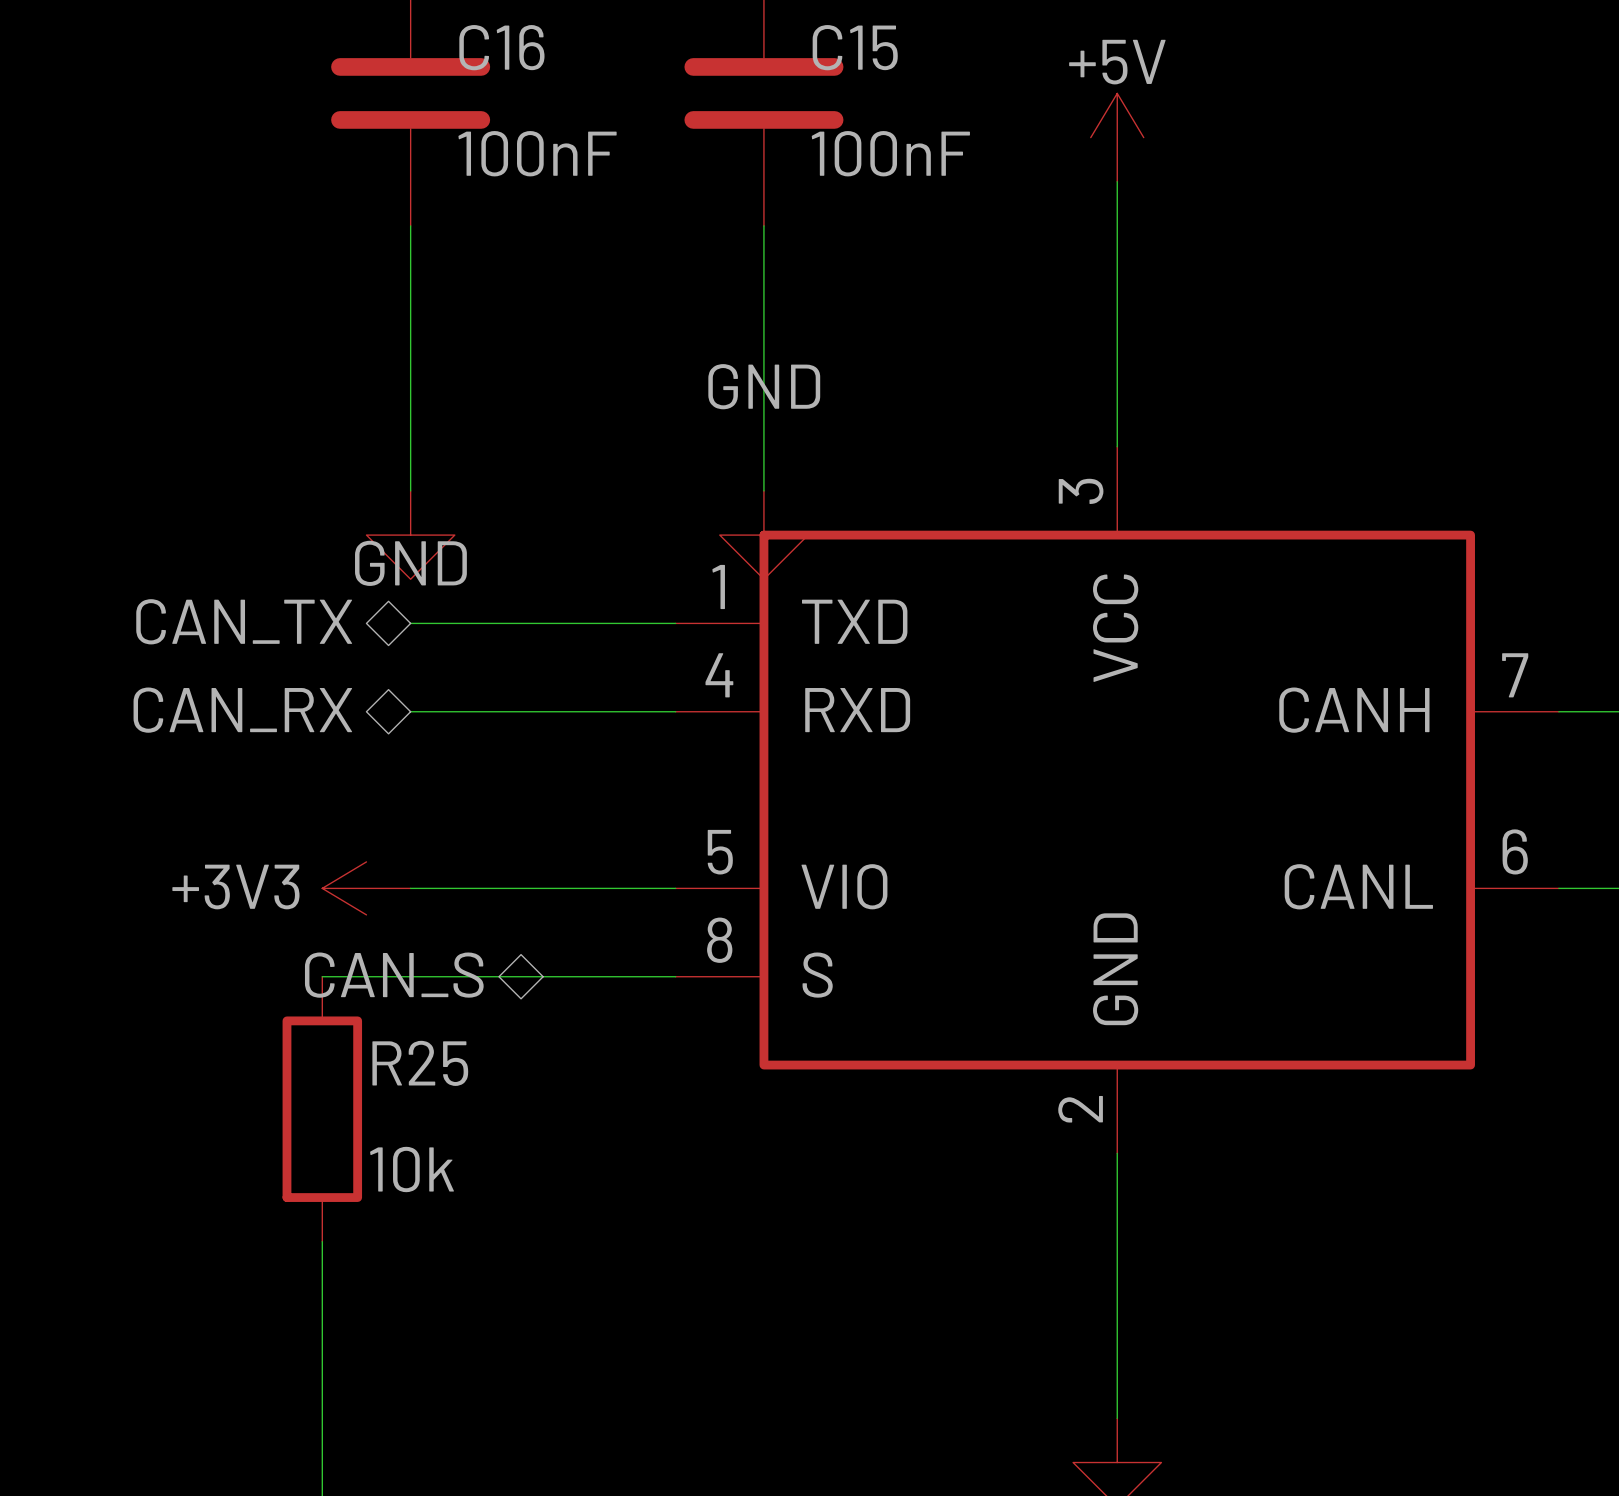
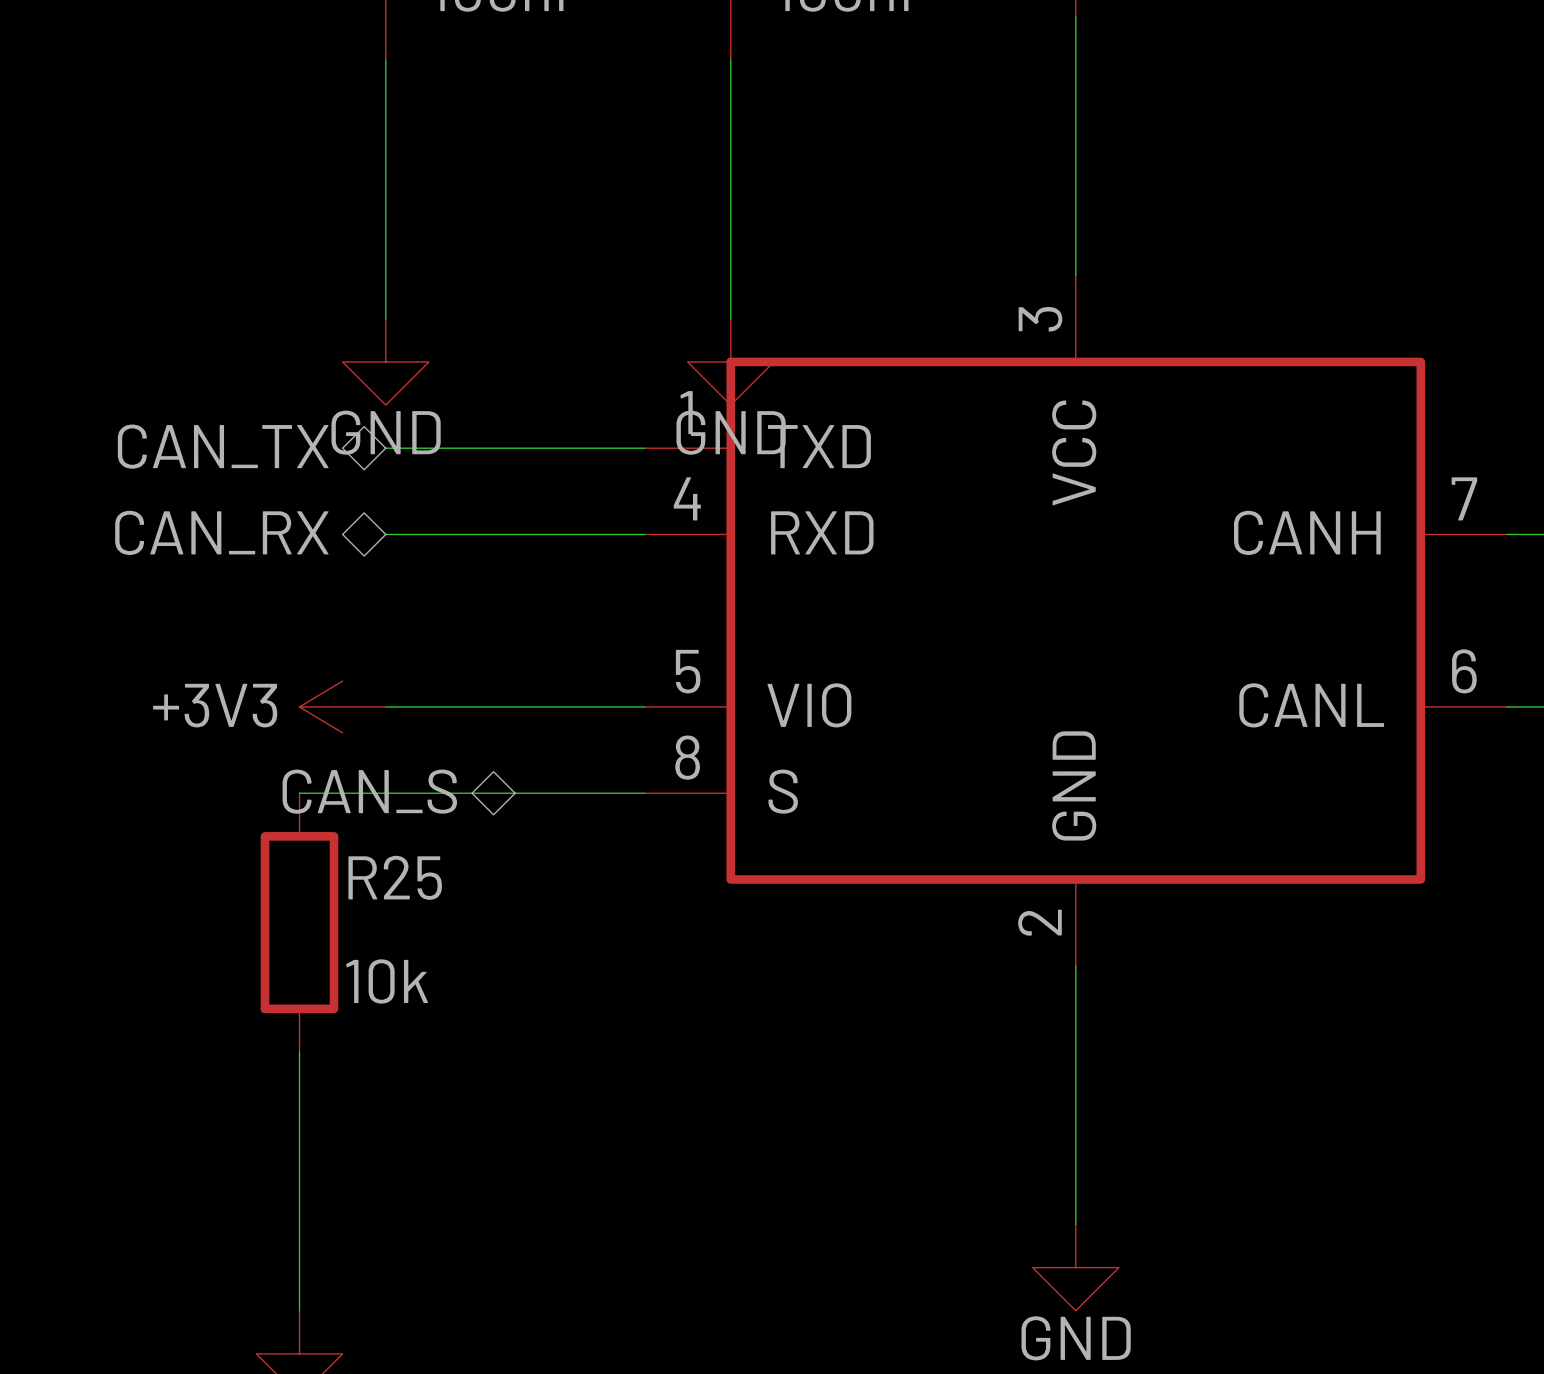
power symbol text position: GND (764, 386) -> GND (731, 432)
power symbol text position: GND (410, 563) -> GND (386, 432)

